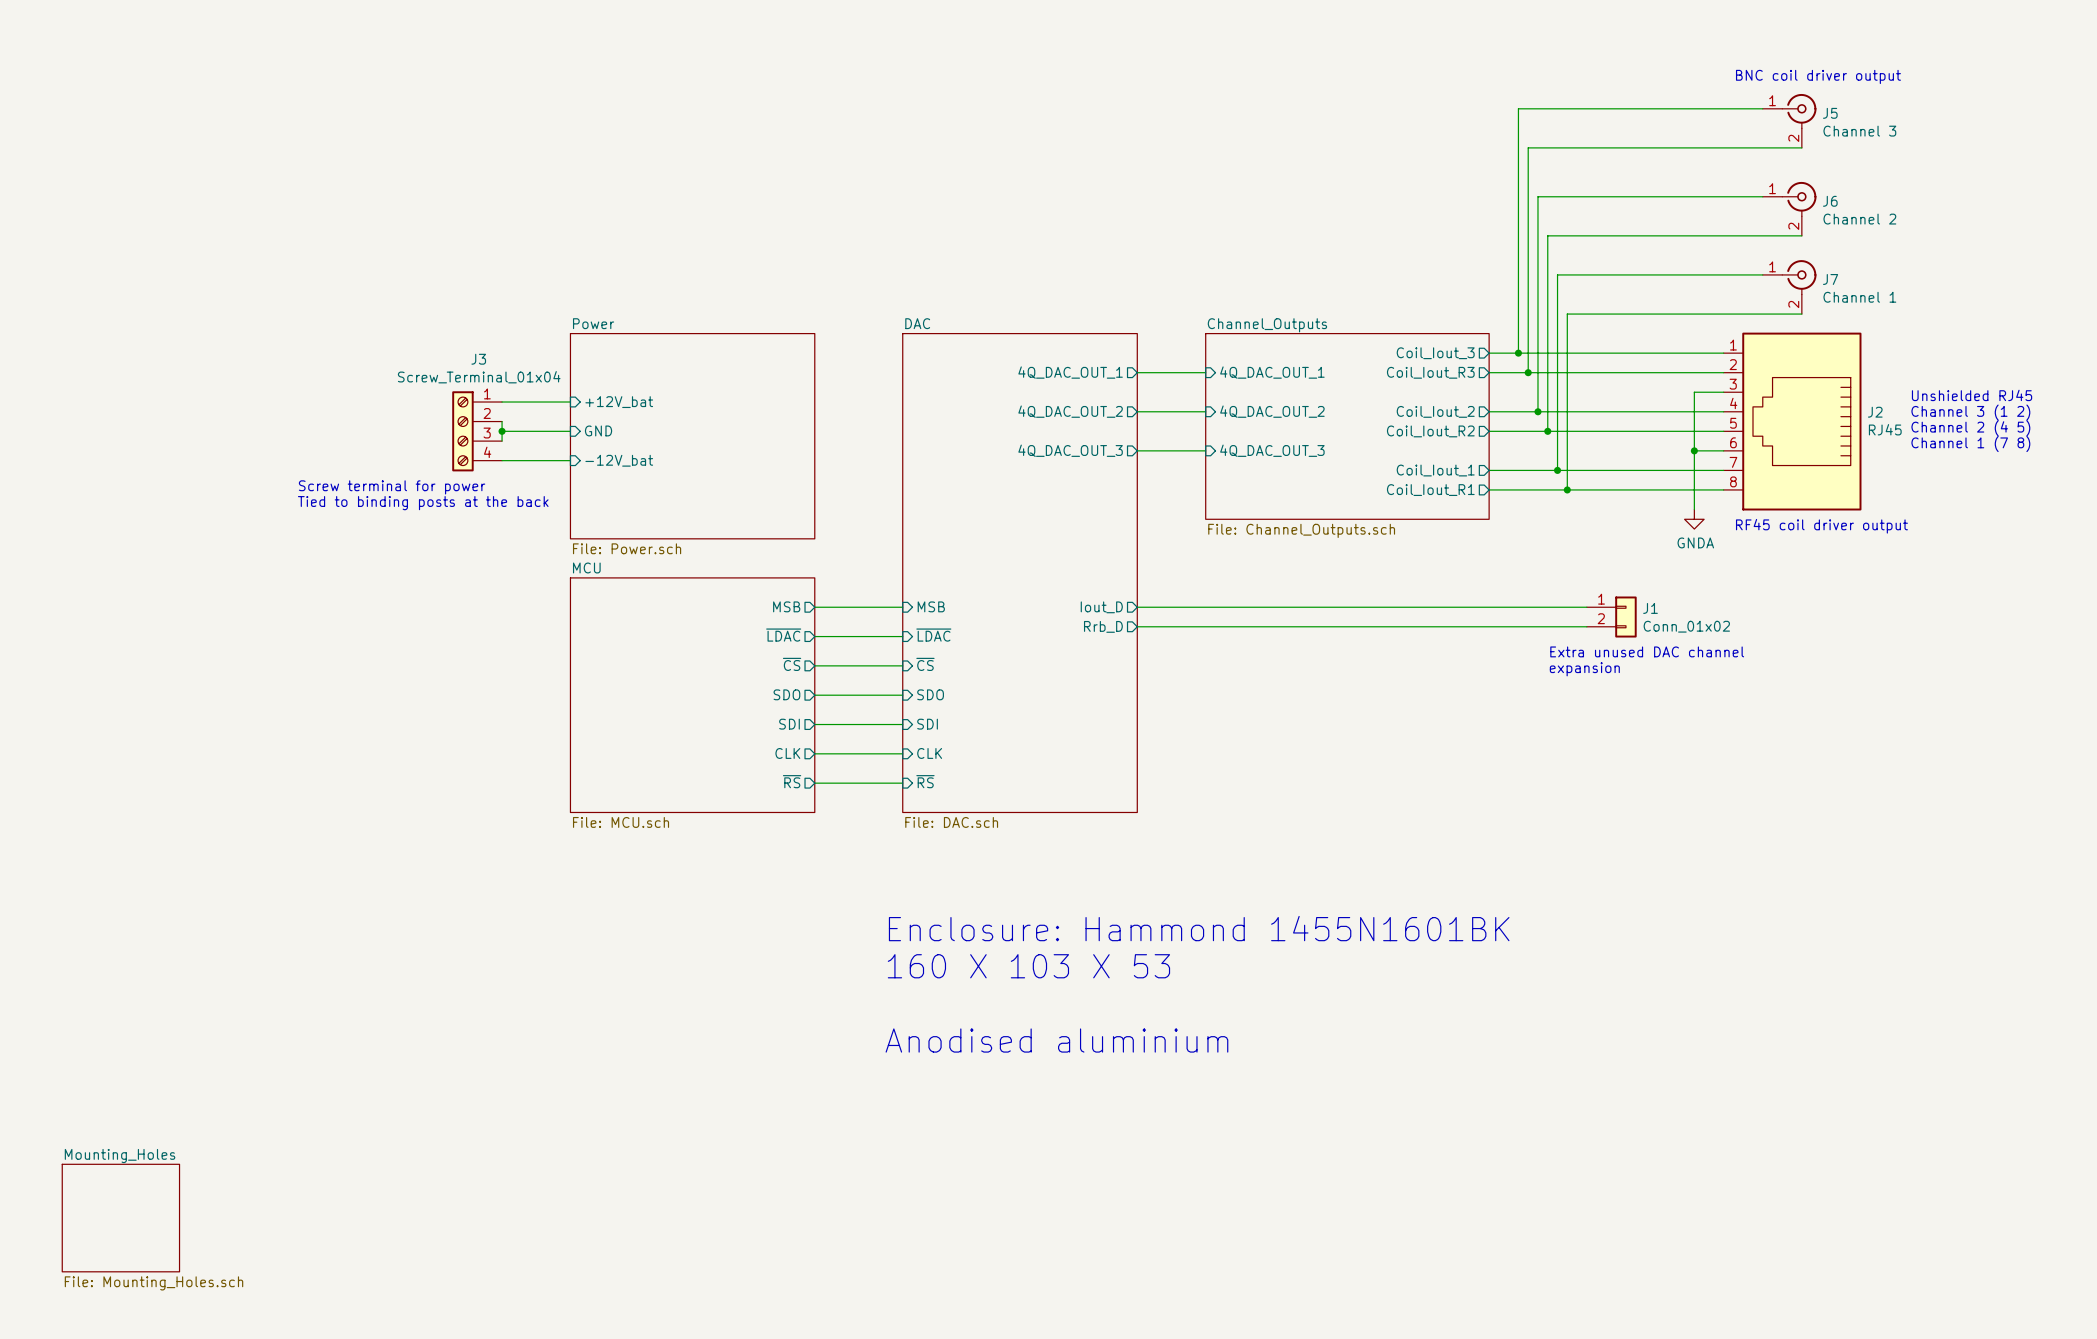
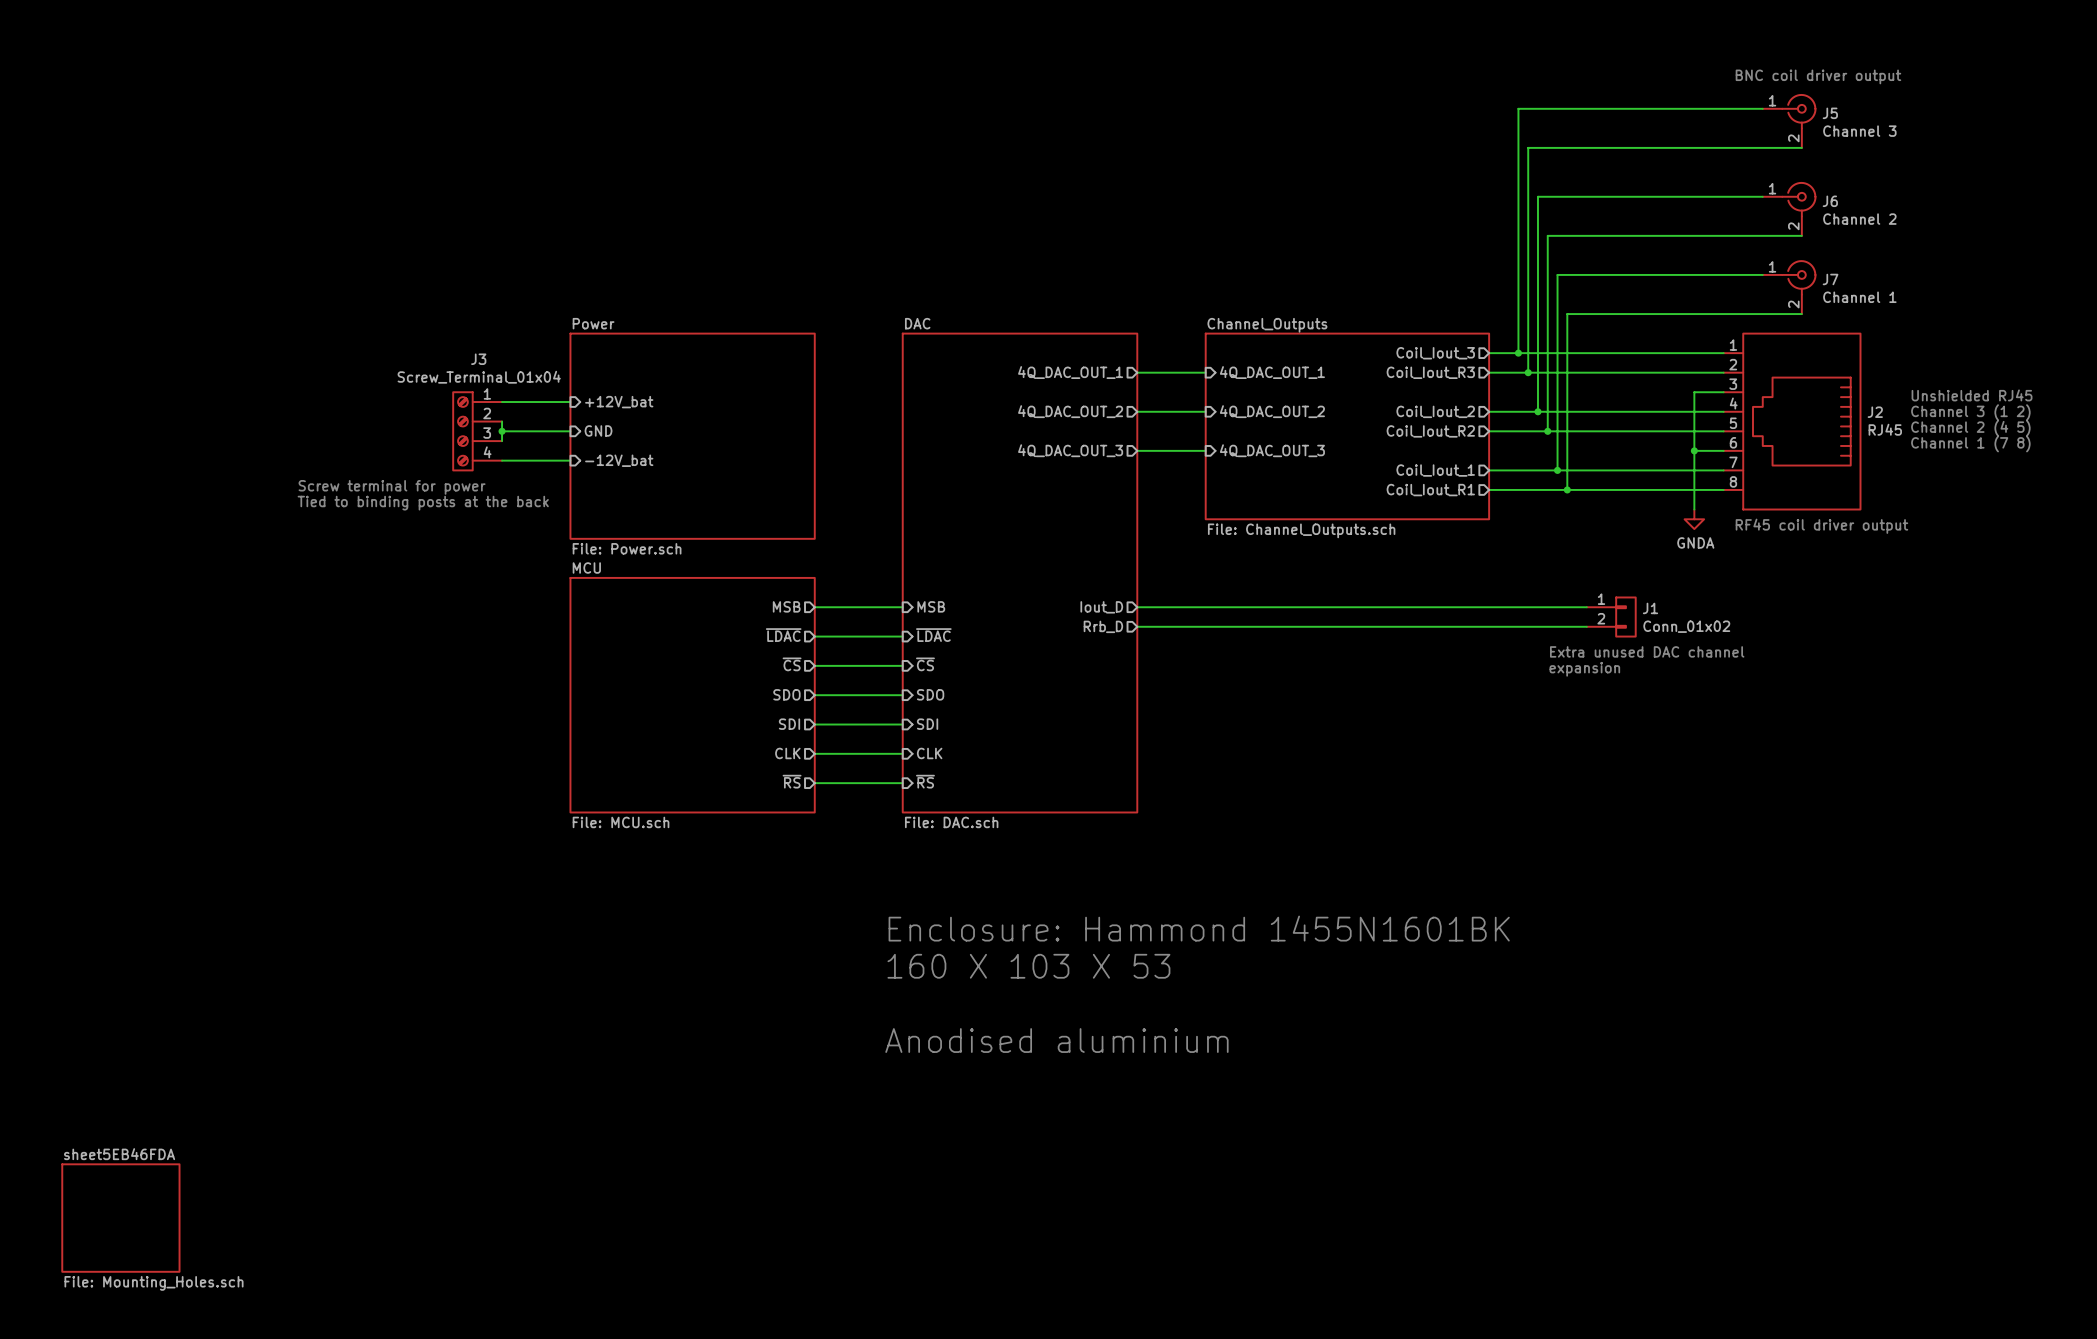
sheet Mounting_Holes name: Mounting_Holes (120, 1156) -> sheet5EB46FDA (119, 1154)

